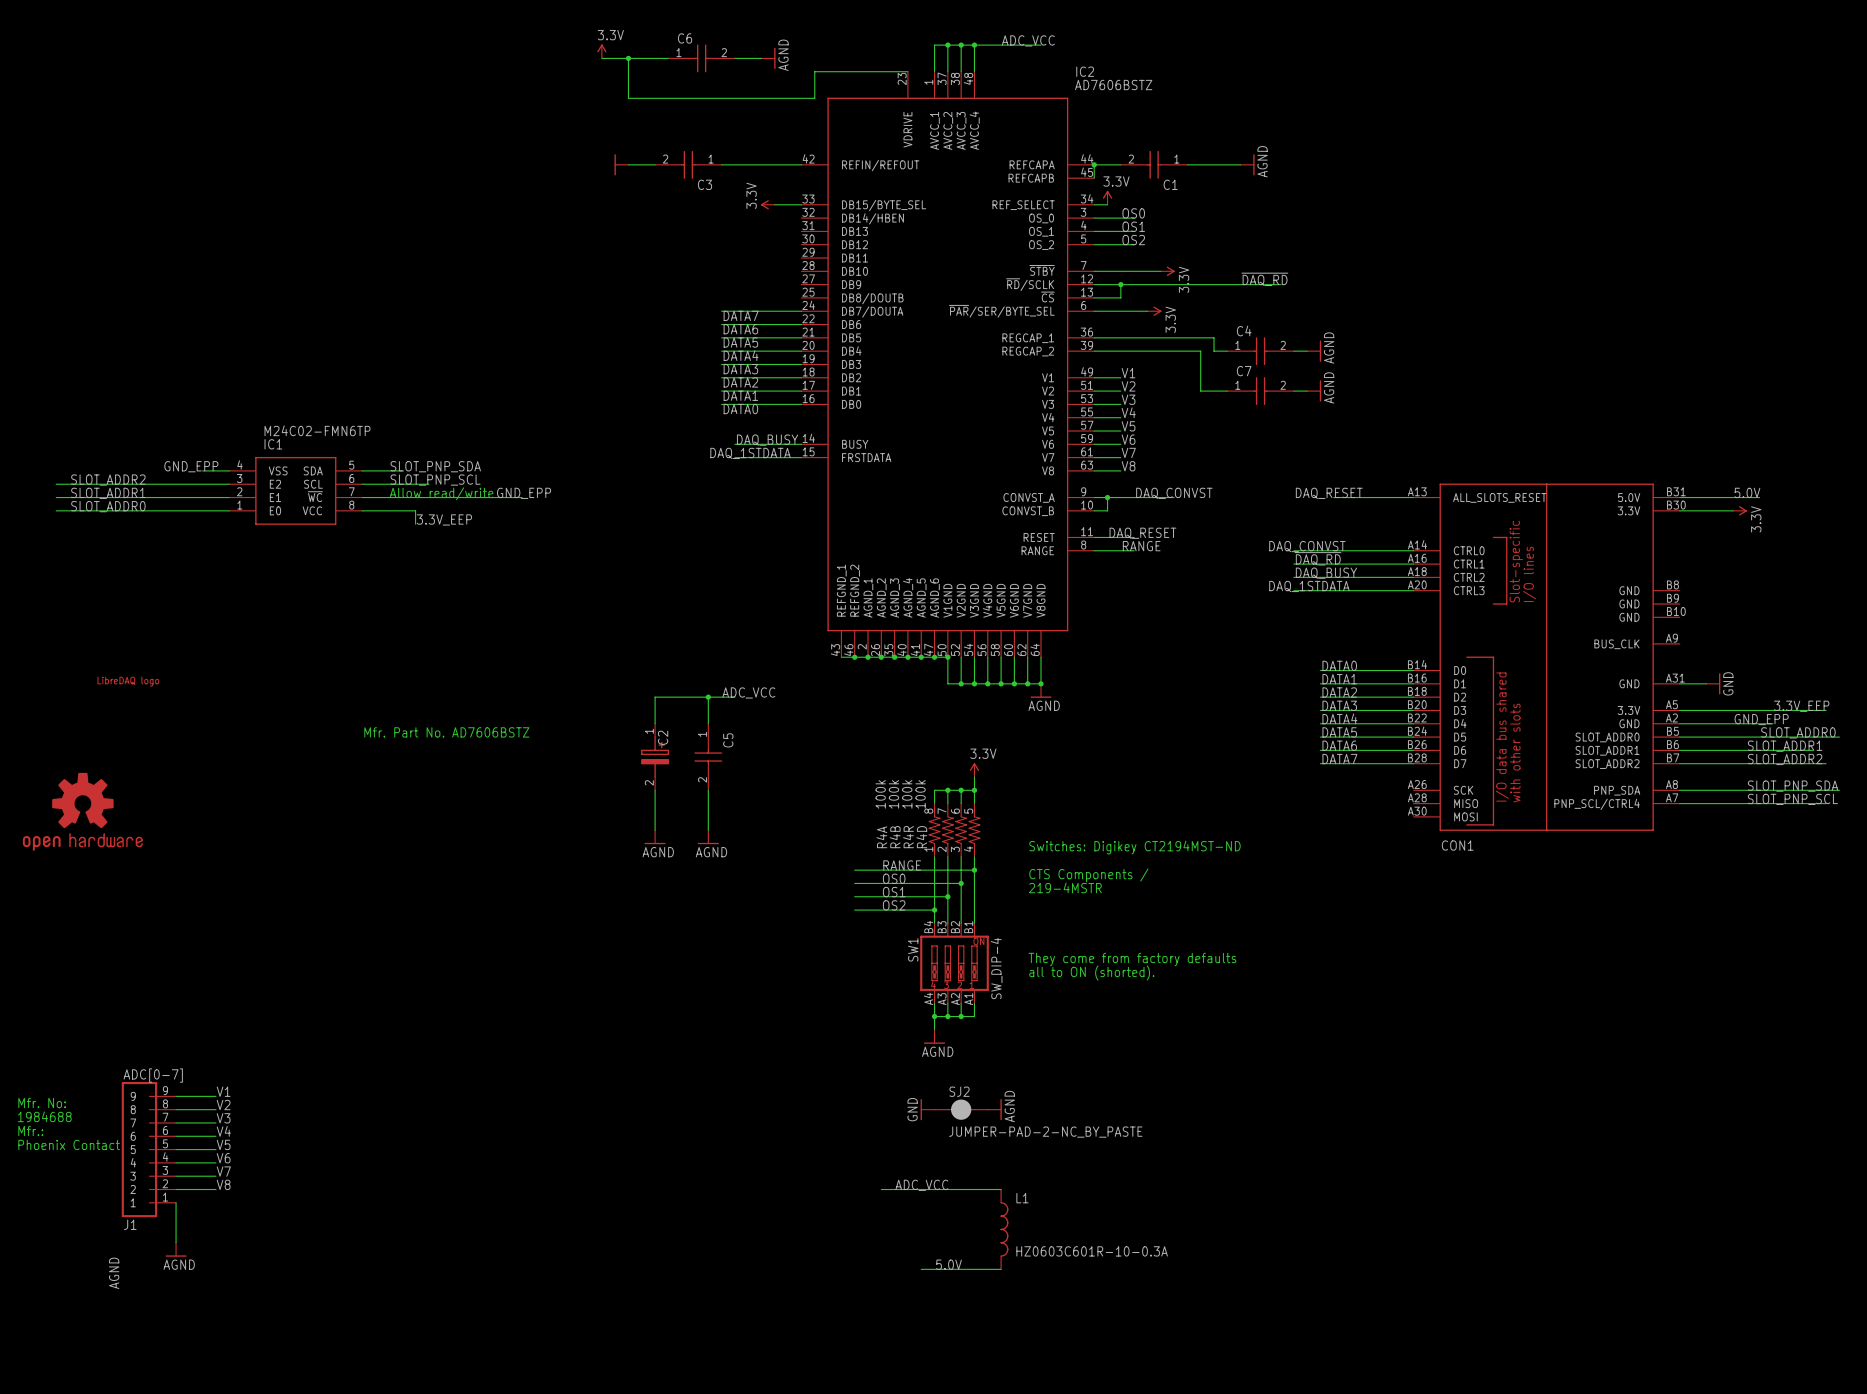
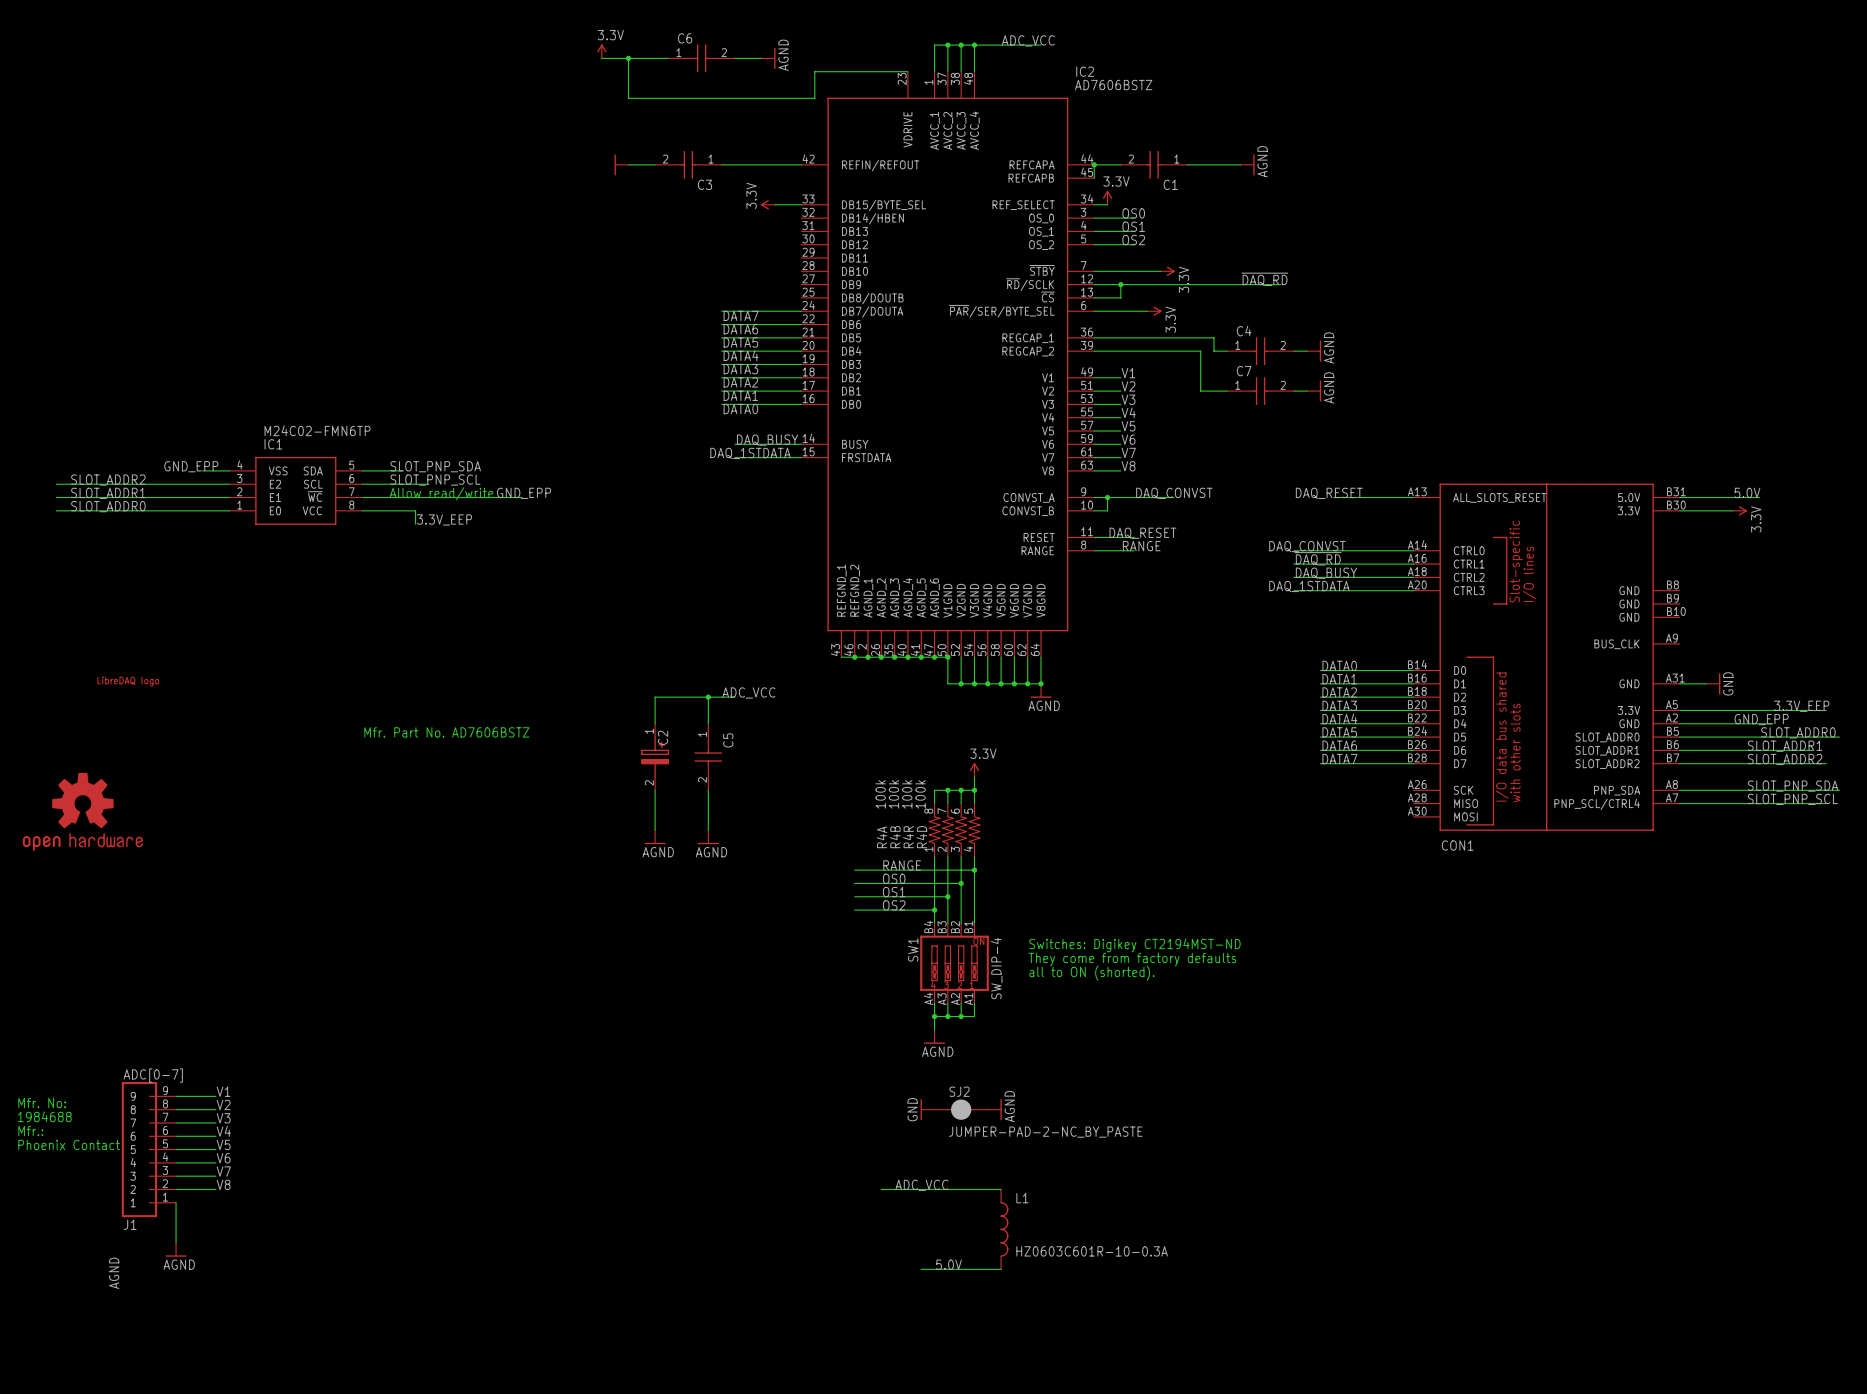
text position: Switches: Digikey CT2194MST-ND (1134, 847) -> Switches: Digikey CT2194MST-ND (1134, 945)
text: CTS Components / (1088, 875) -> none
text: 219-4MSTR (1065, 887) -> none

